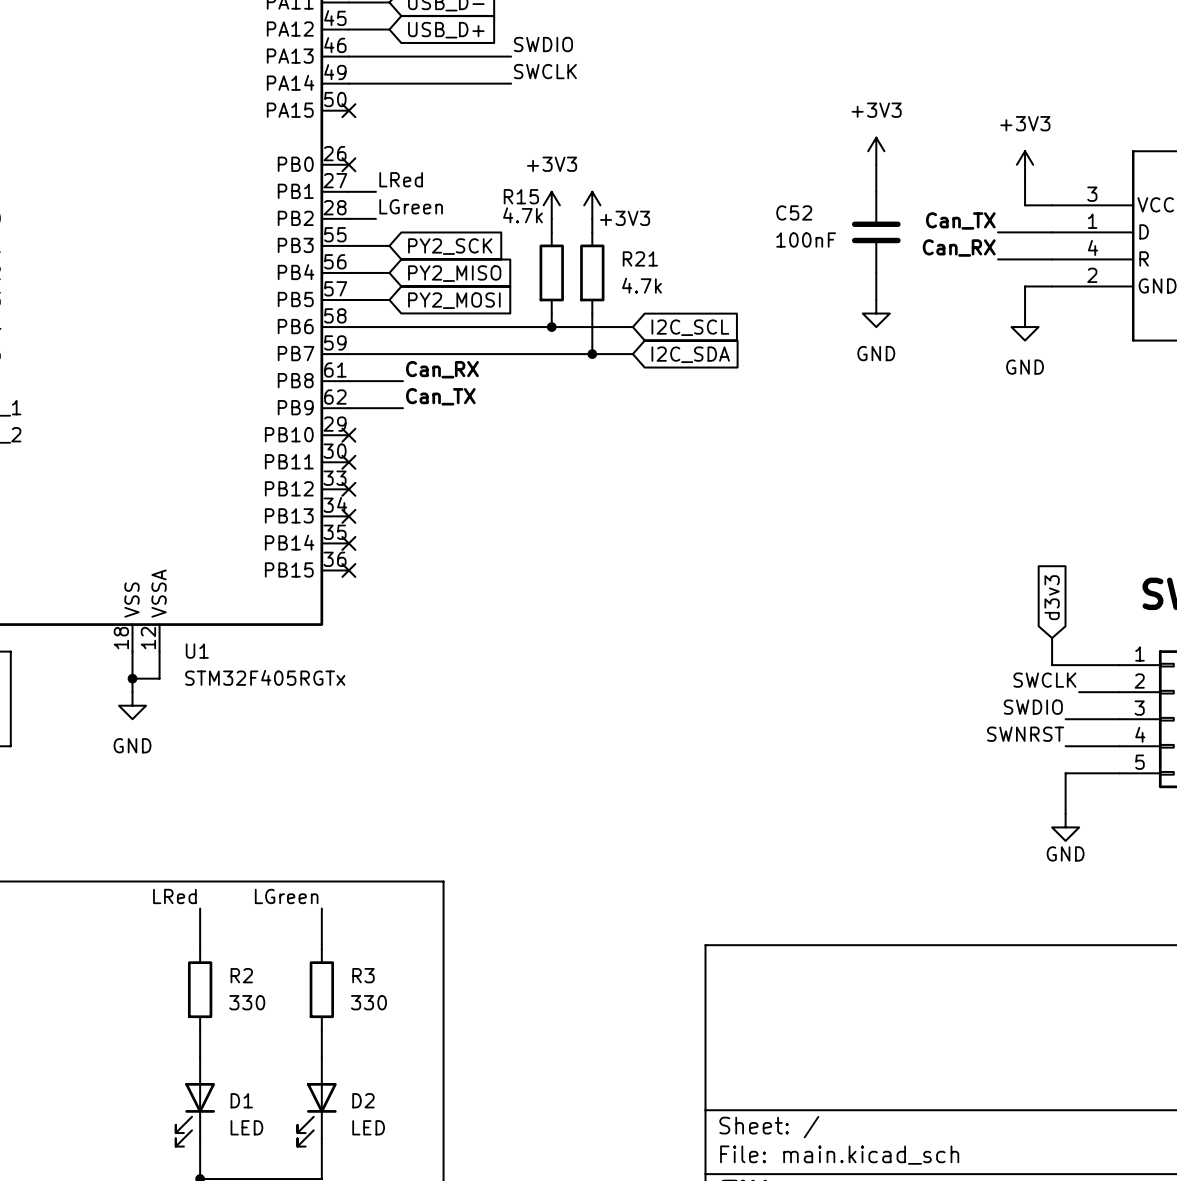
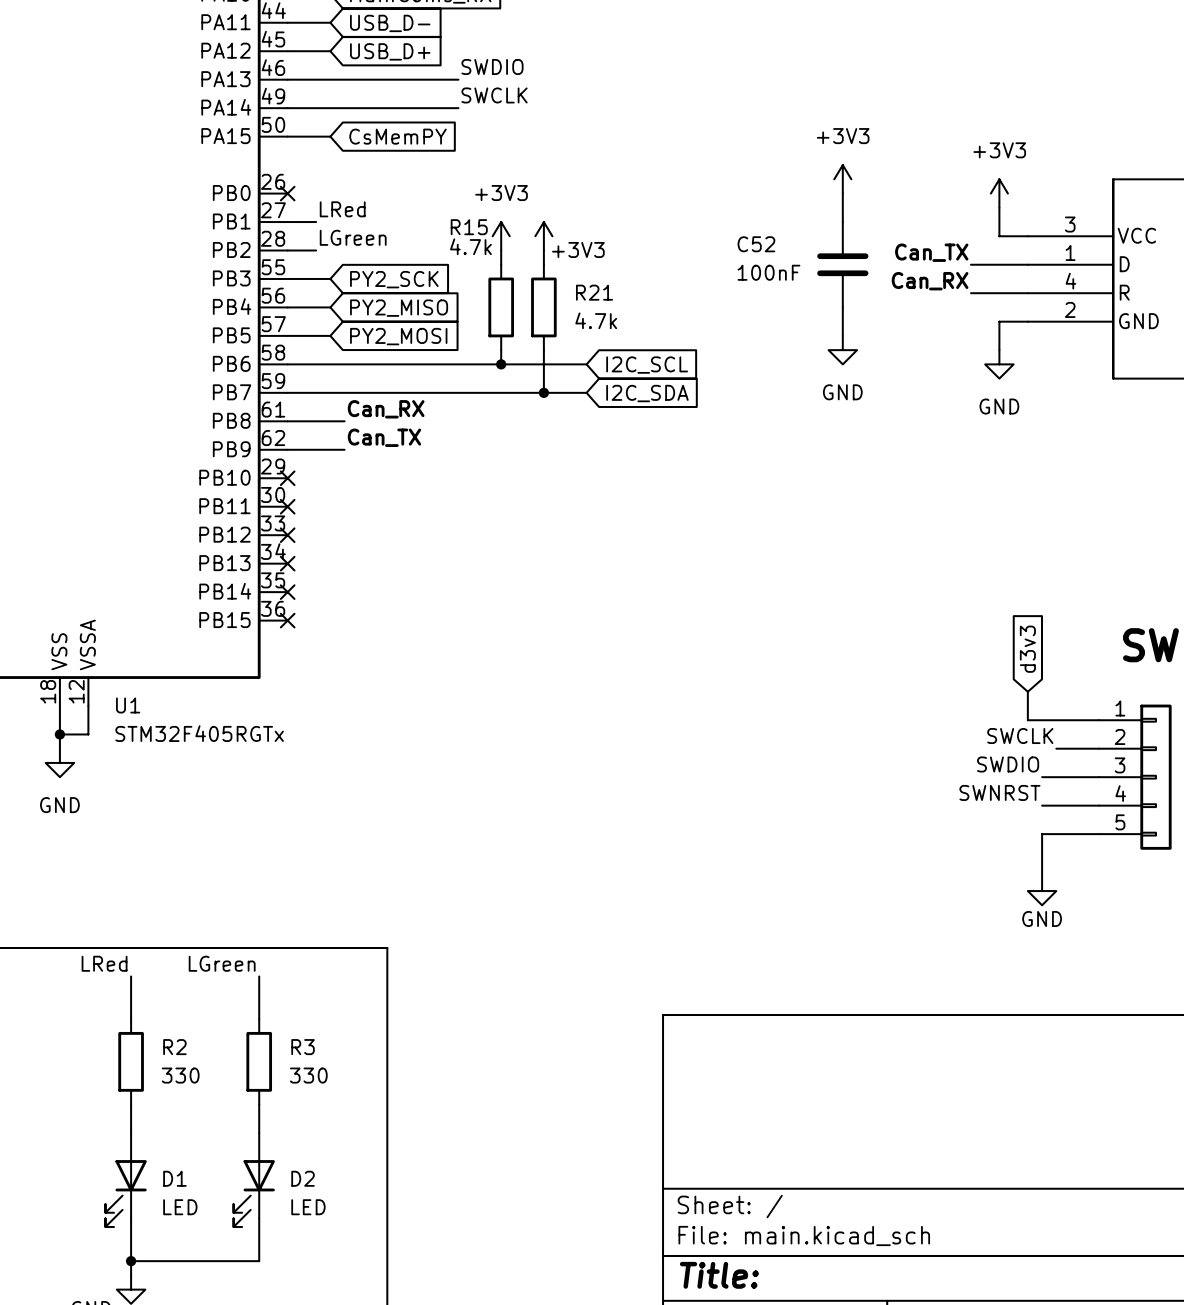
wire: none -> (287, 136) (330, 136)
no-connect mark: (348, 110) -> none
global label: none -> CsMemPY (398, 136)

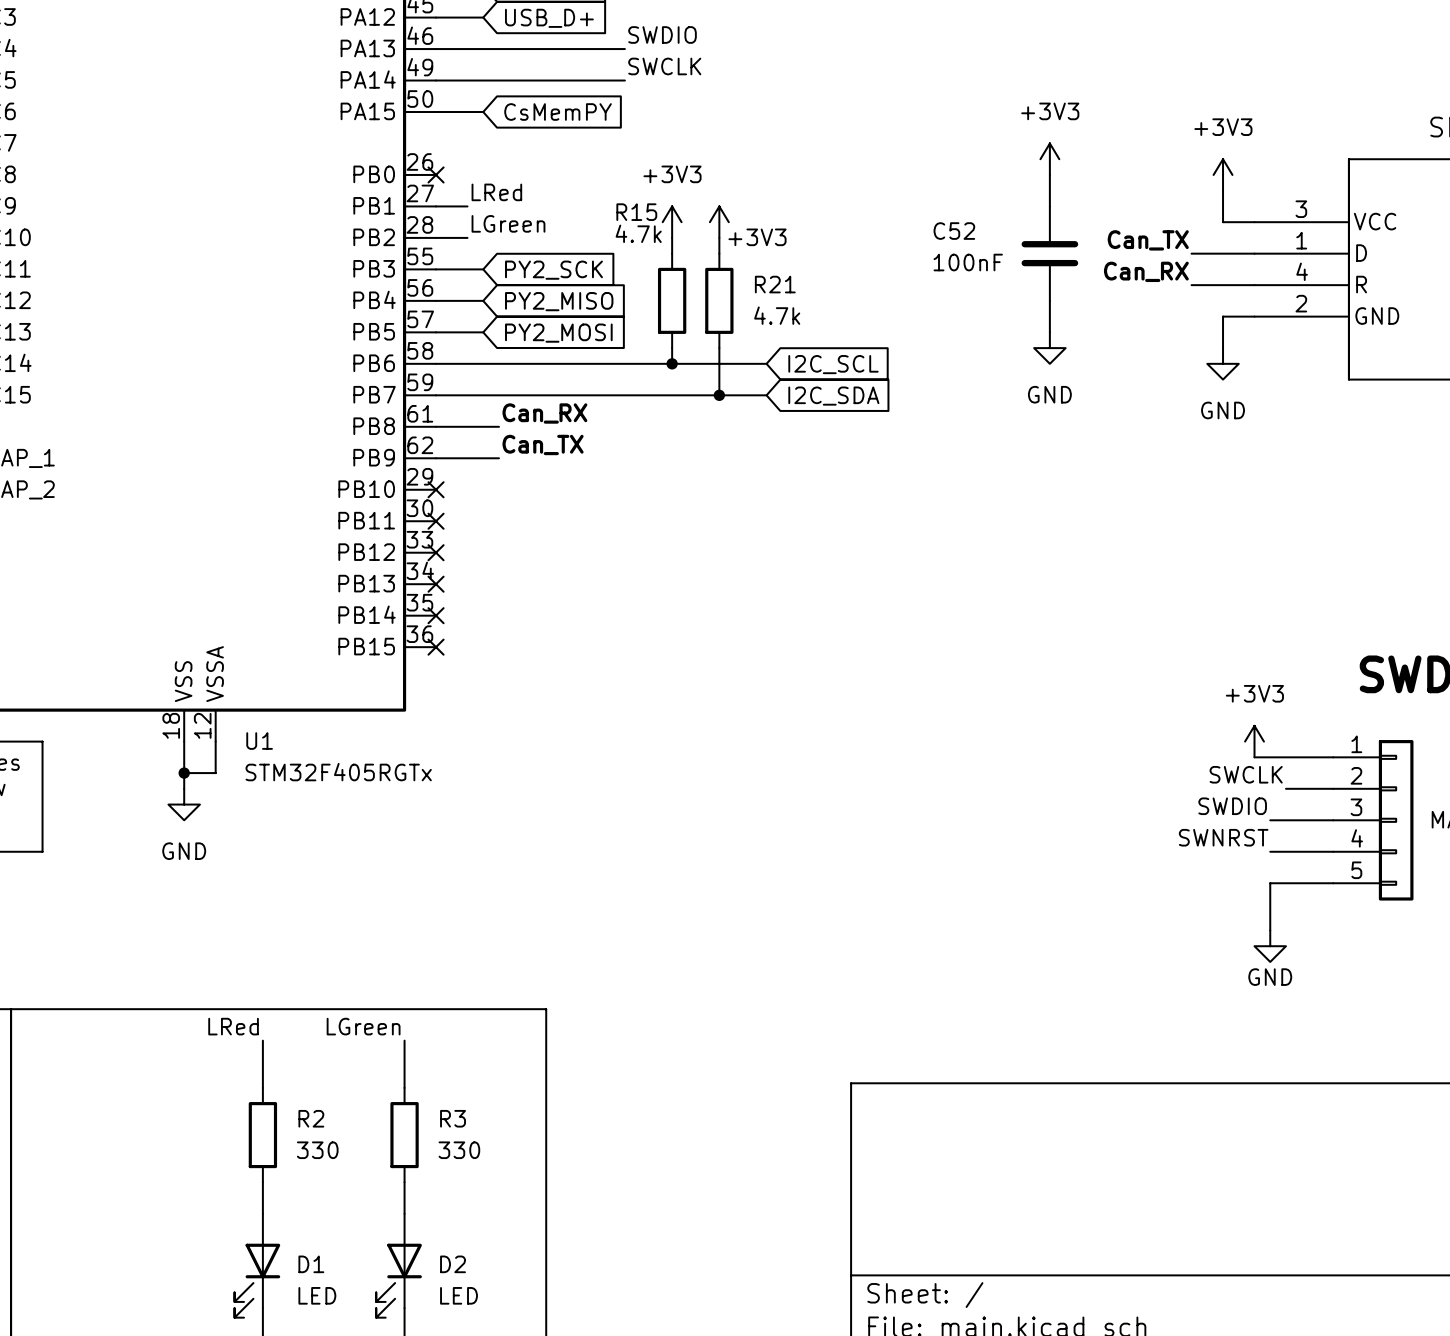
global label: d3v3 (1027, 649) -> none
power symbol: none -> +3V3 (1254, 741)

